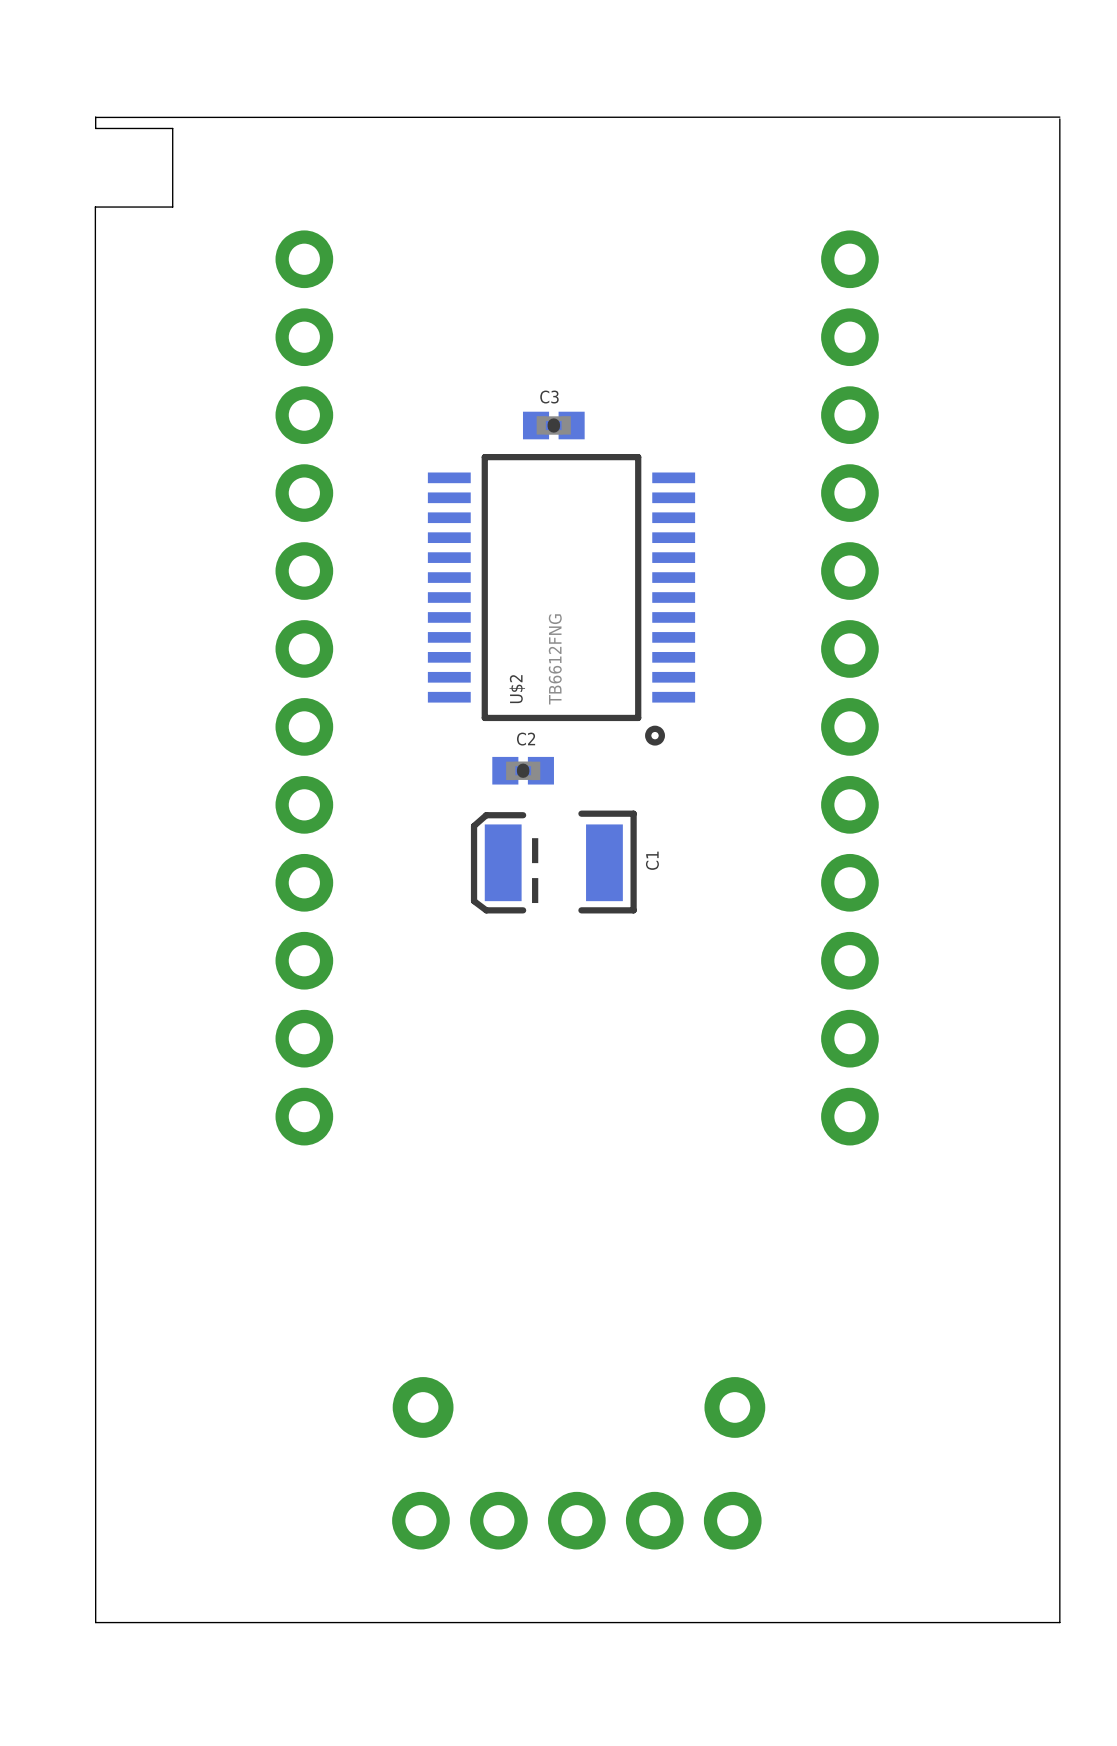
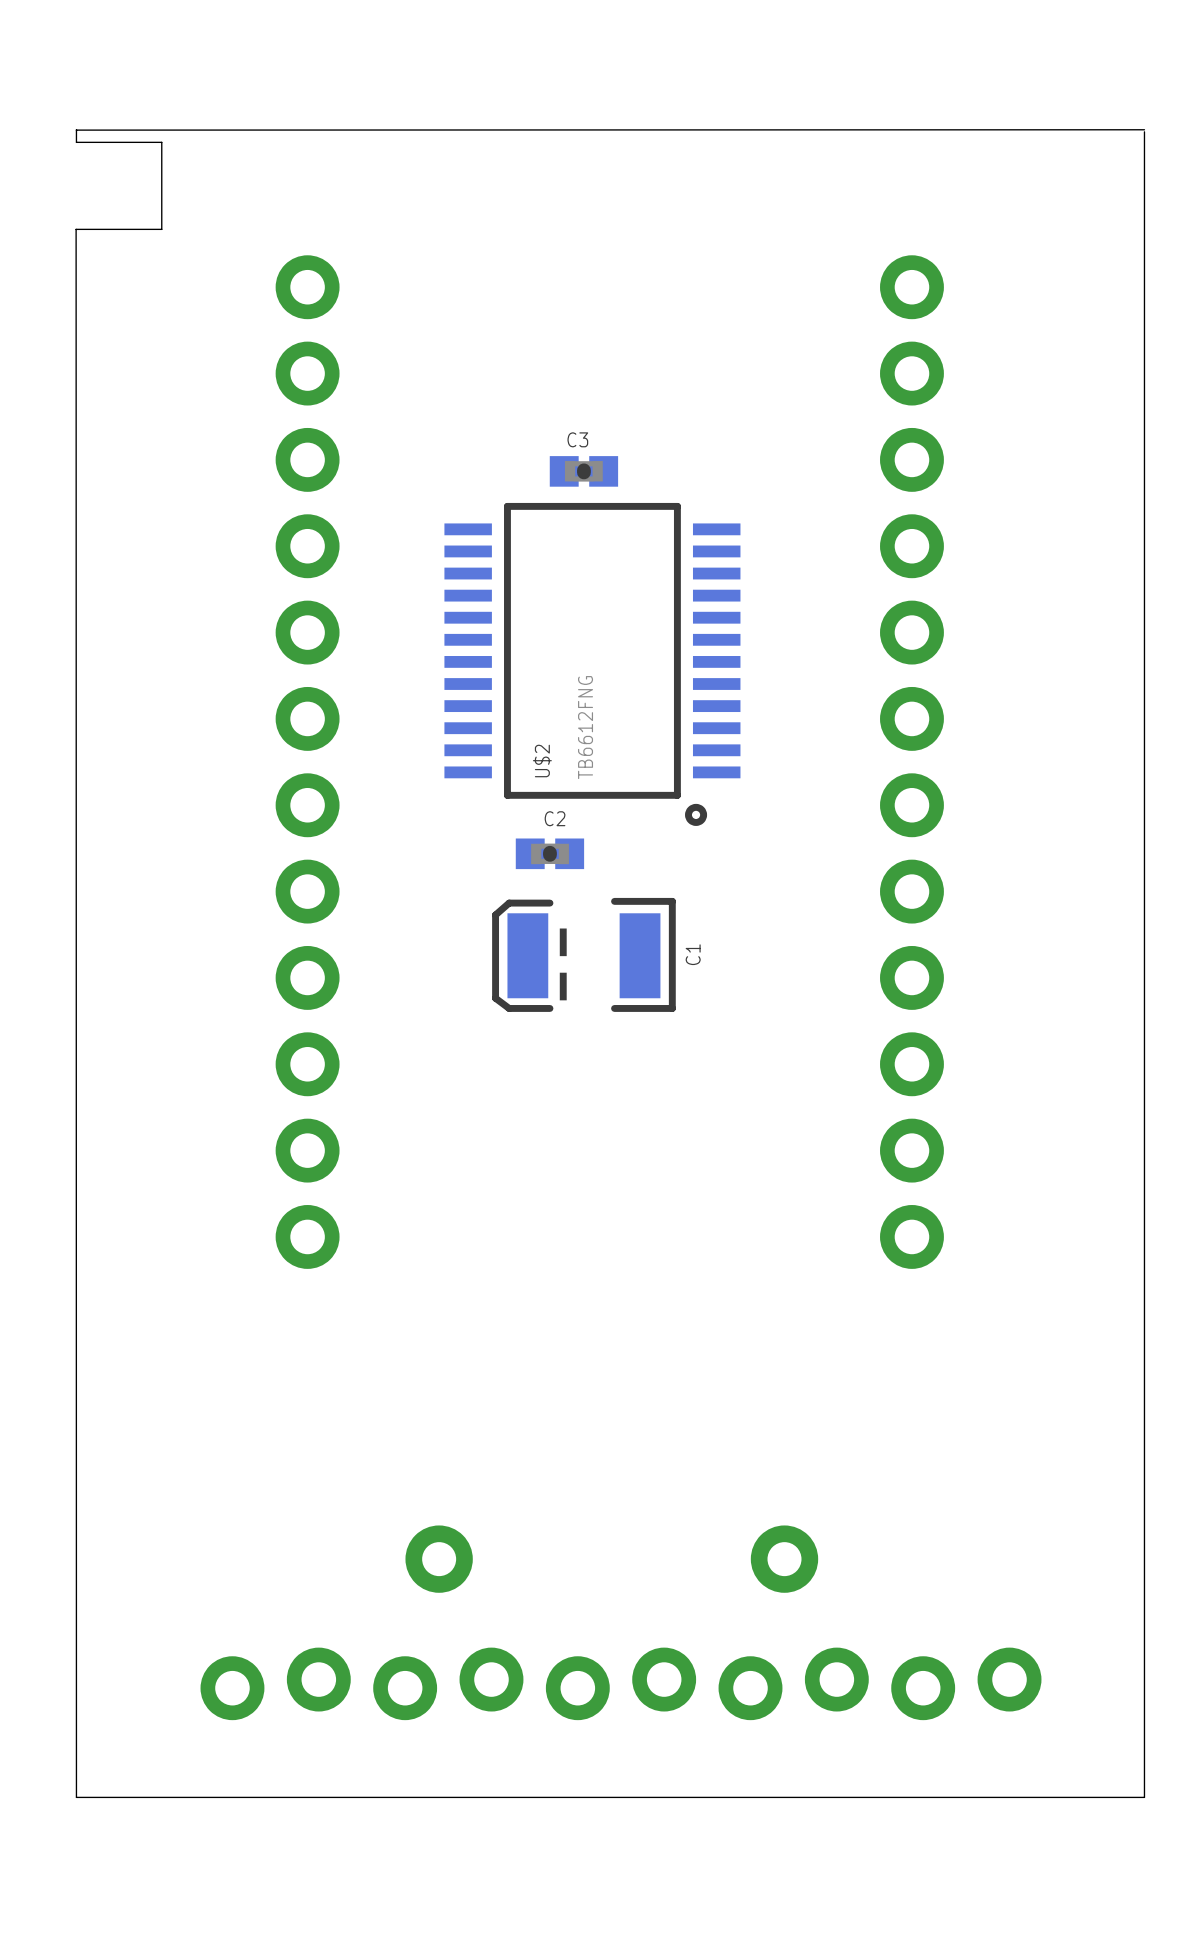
part footprint: [392, 1491, 762, 1550] -> [200, 1647, 1042, 1721]

